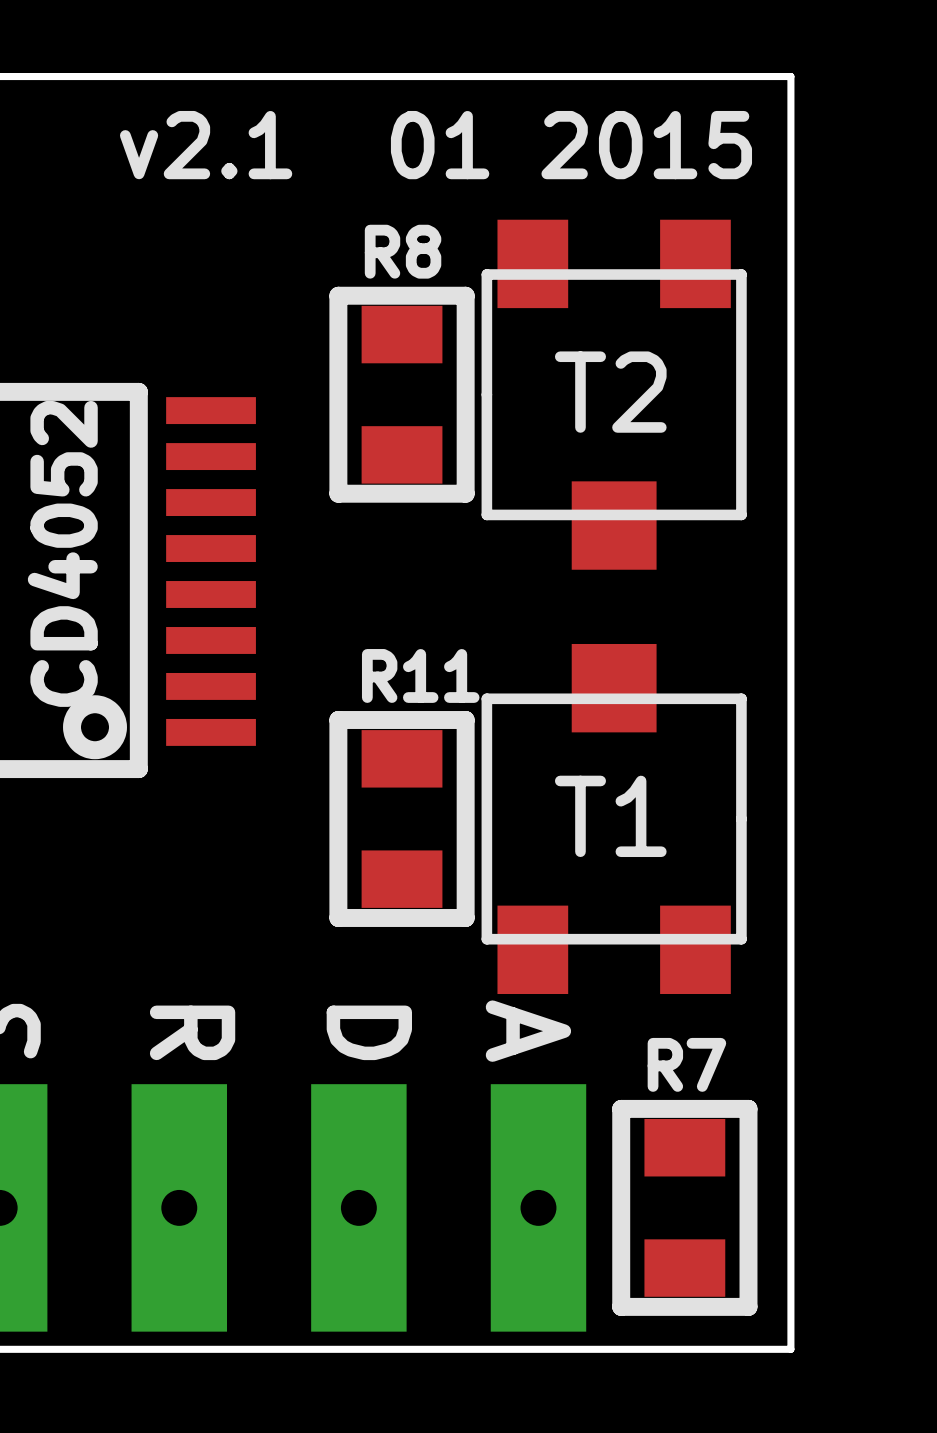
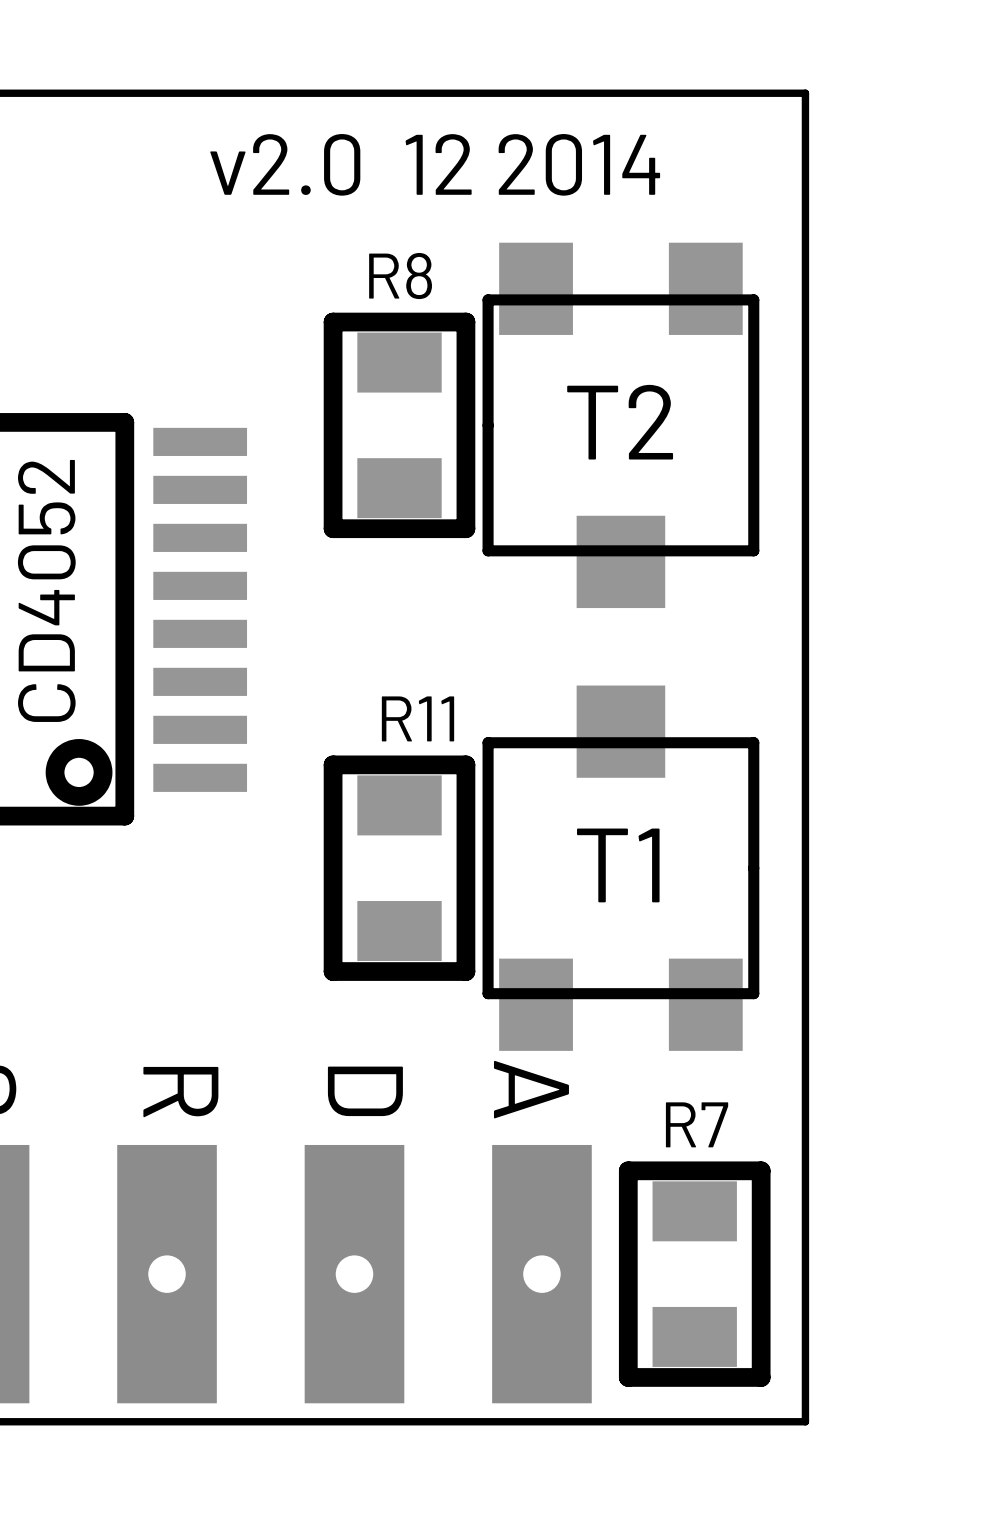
text: v2.1 01 2015 (436, 145) -> v2.0 12 2014 (435, 164)

